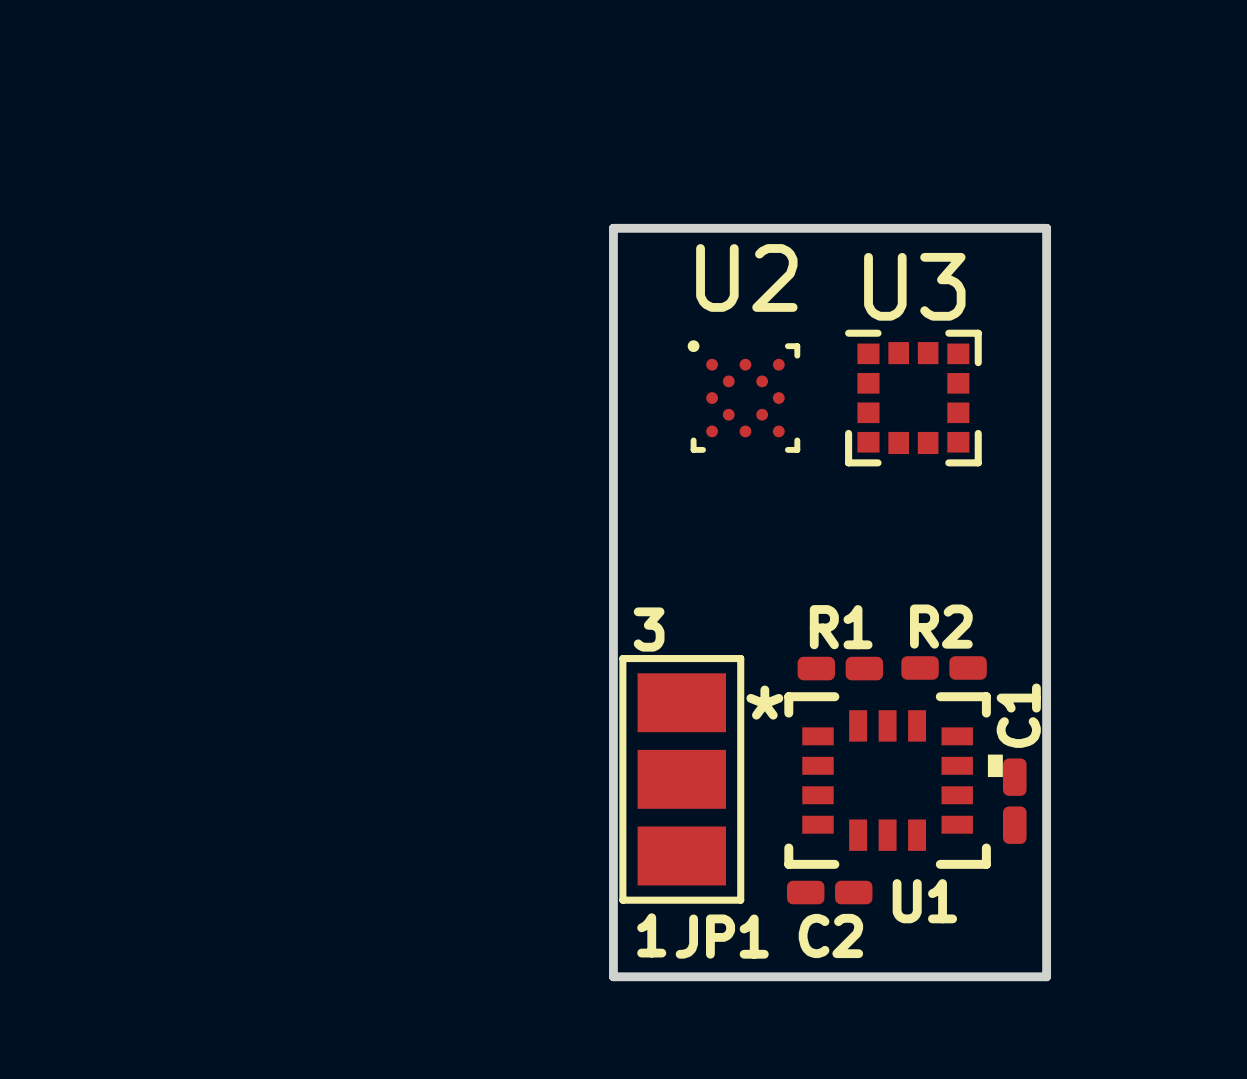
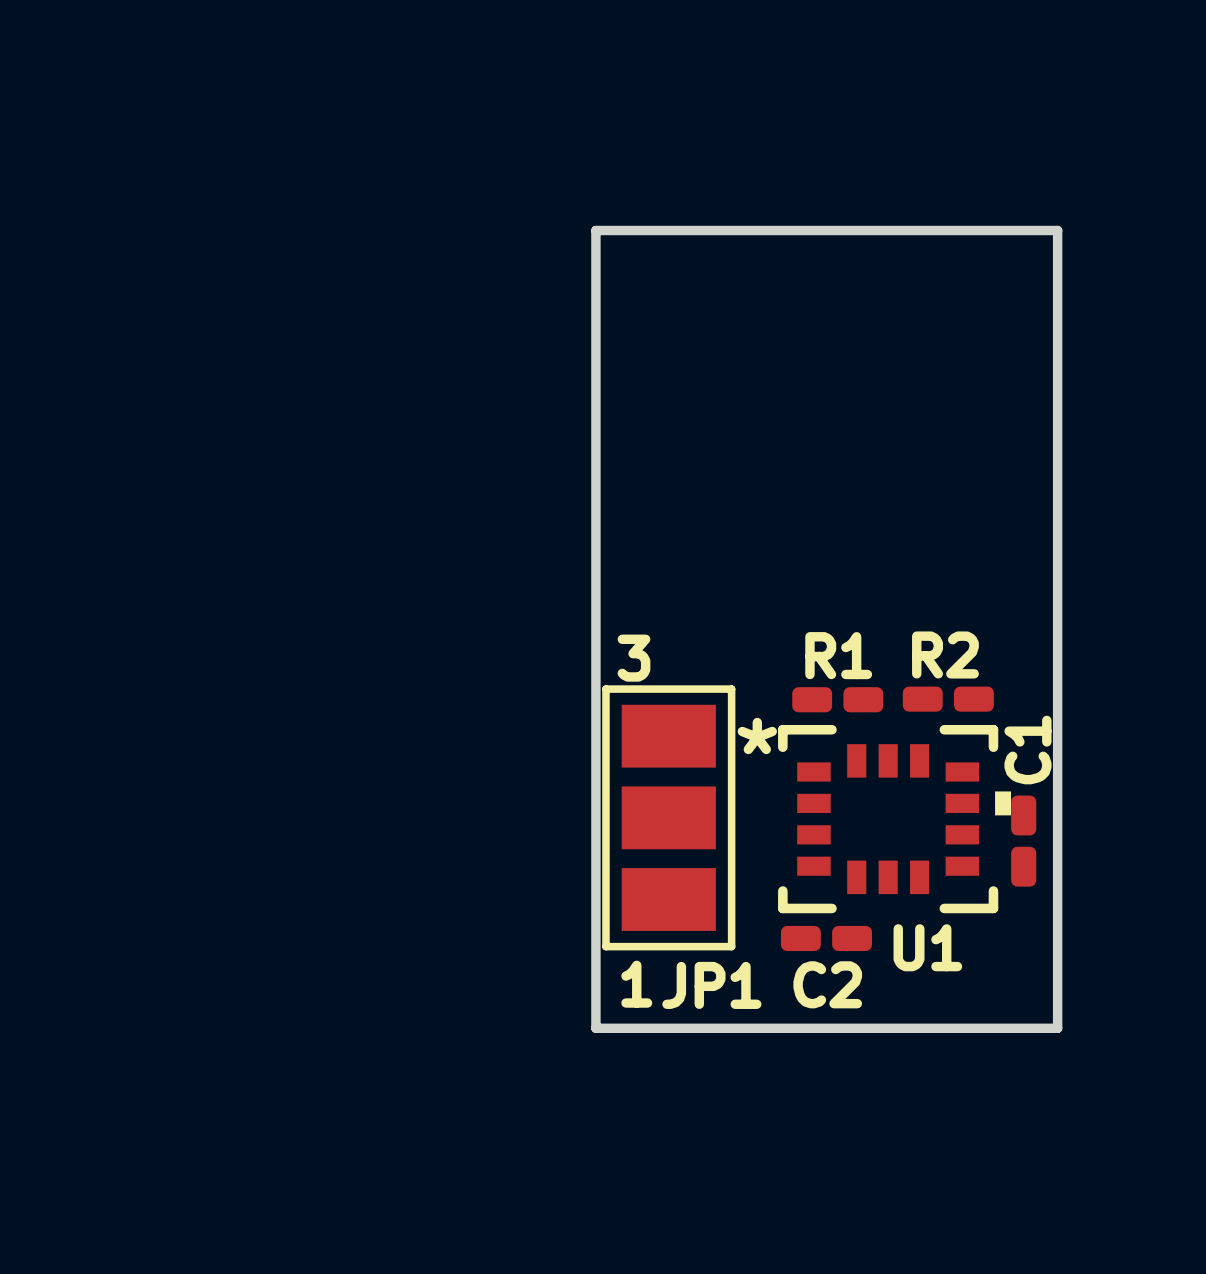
U2: (743, 396) -> none
U3: (913, 398) -> none

